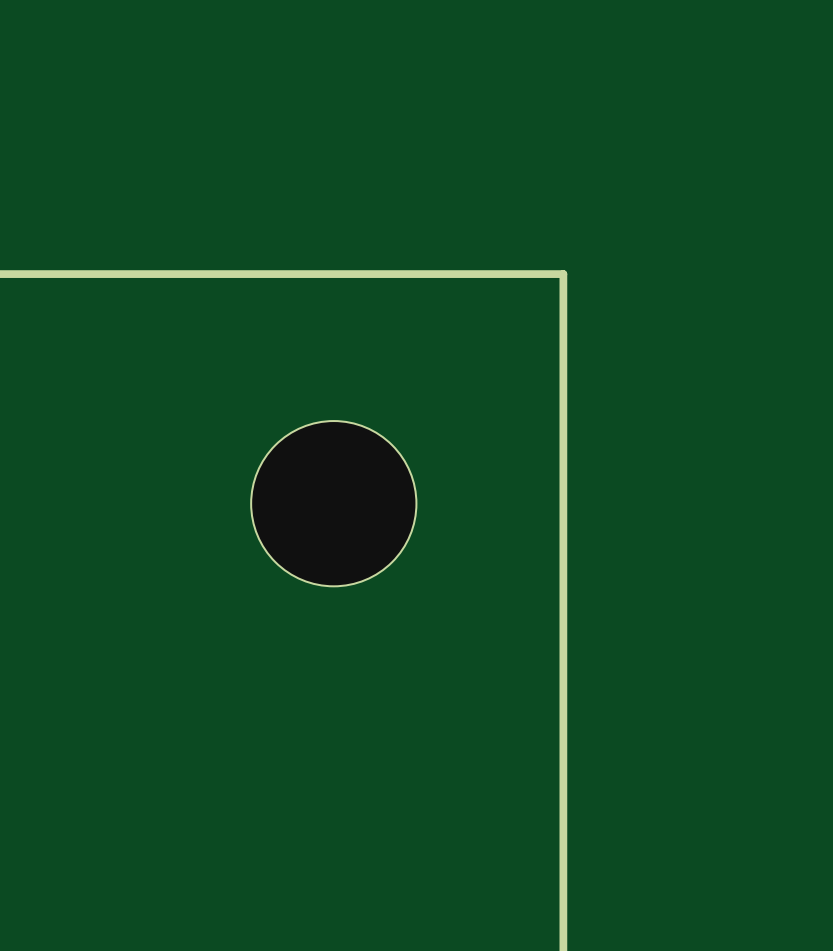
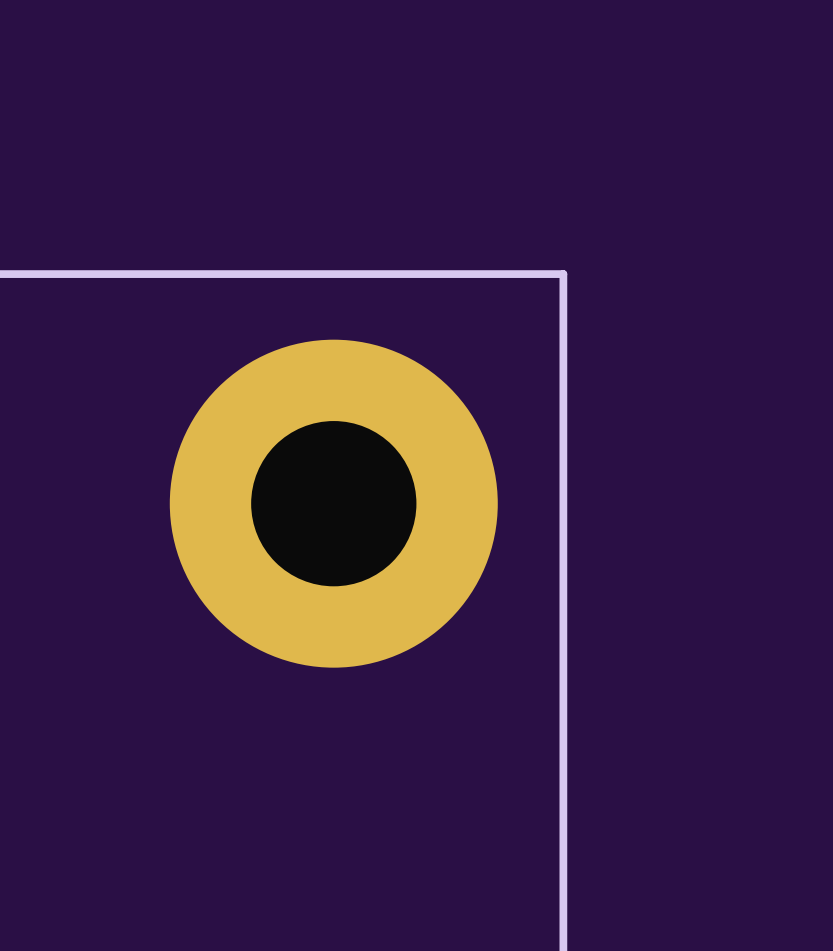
part footprint: [251, 421, 417, 587] -> [169, 339, 498, 668]

